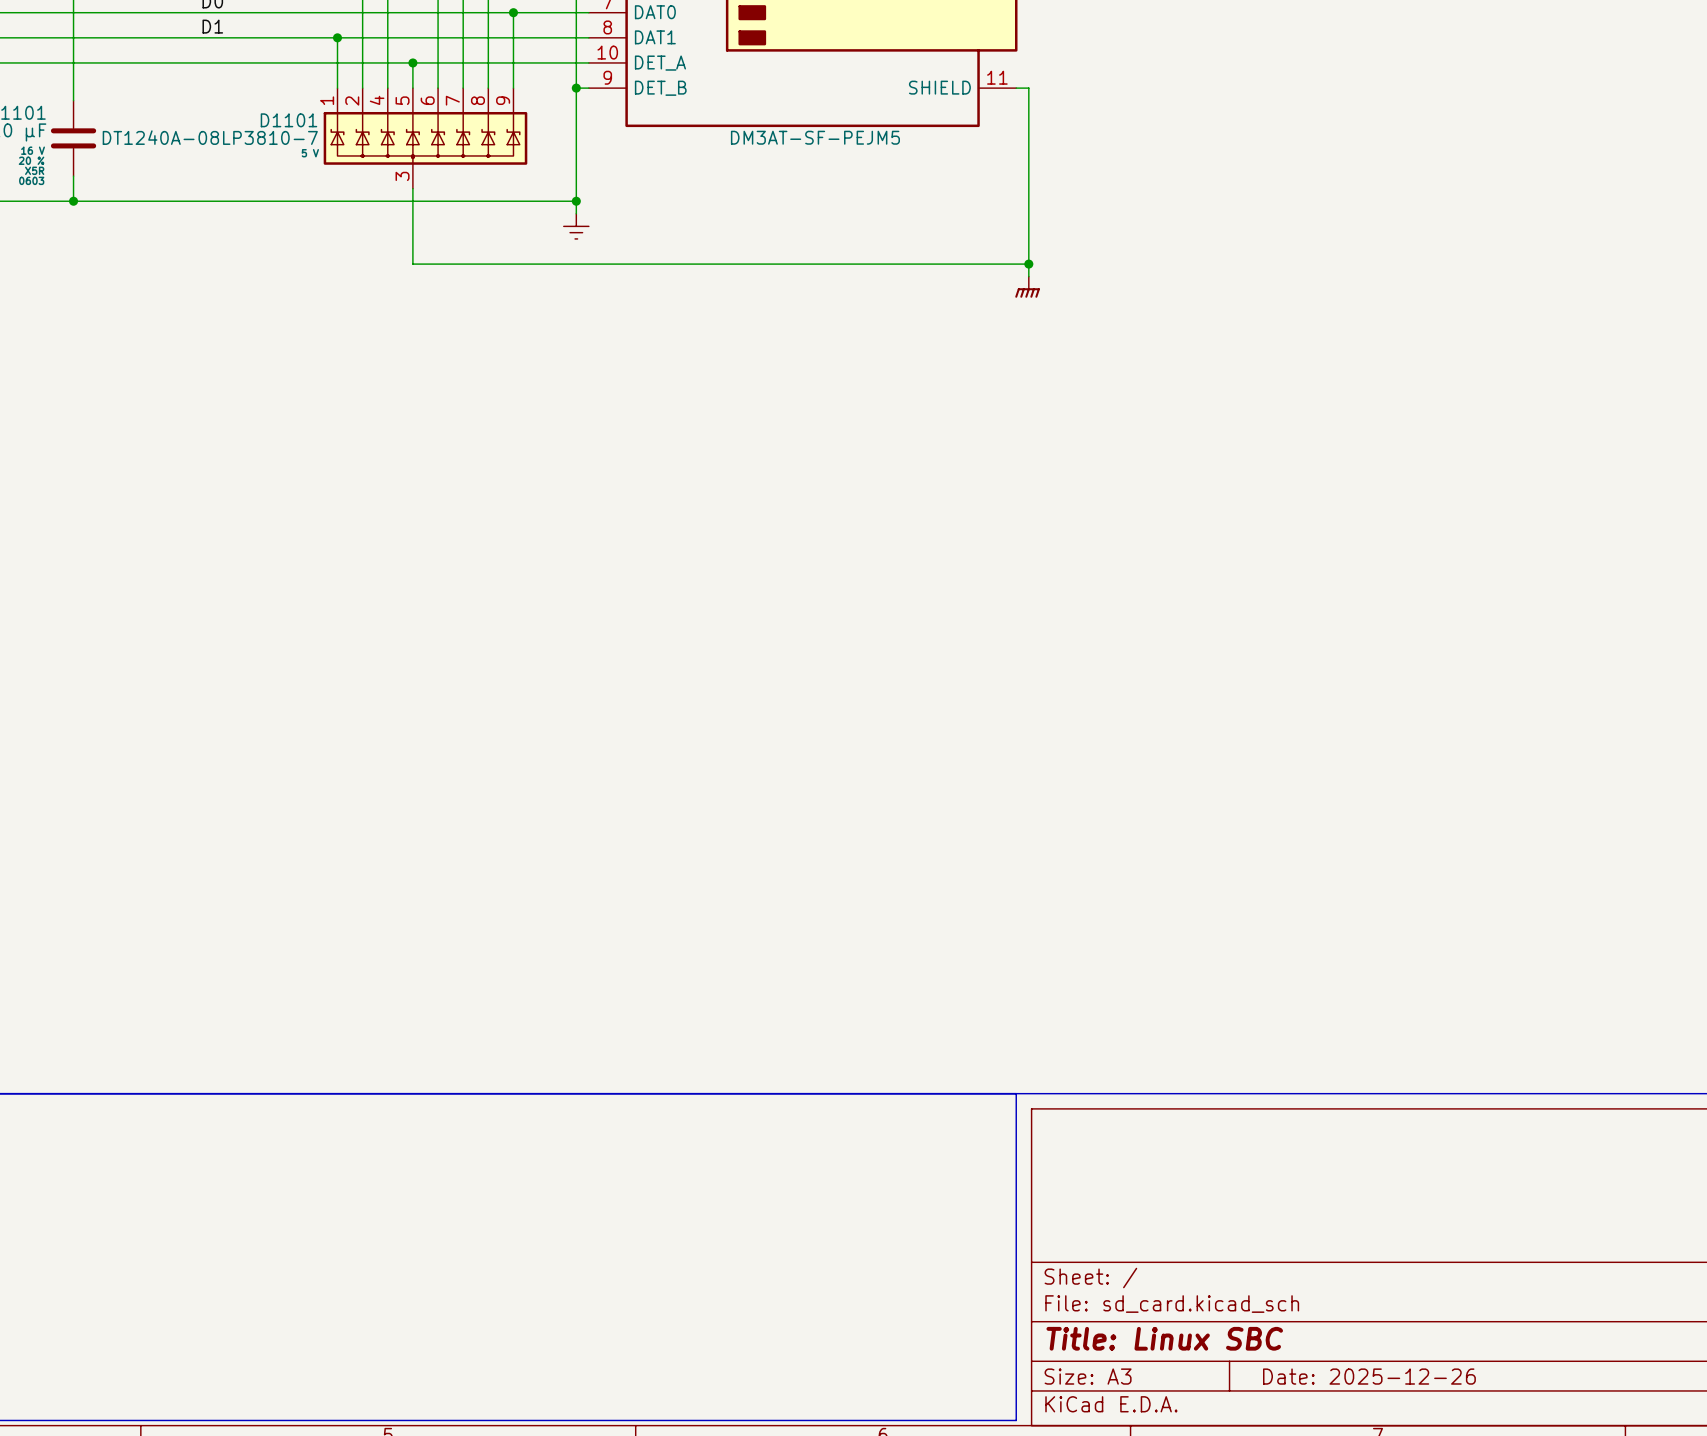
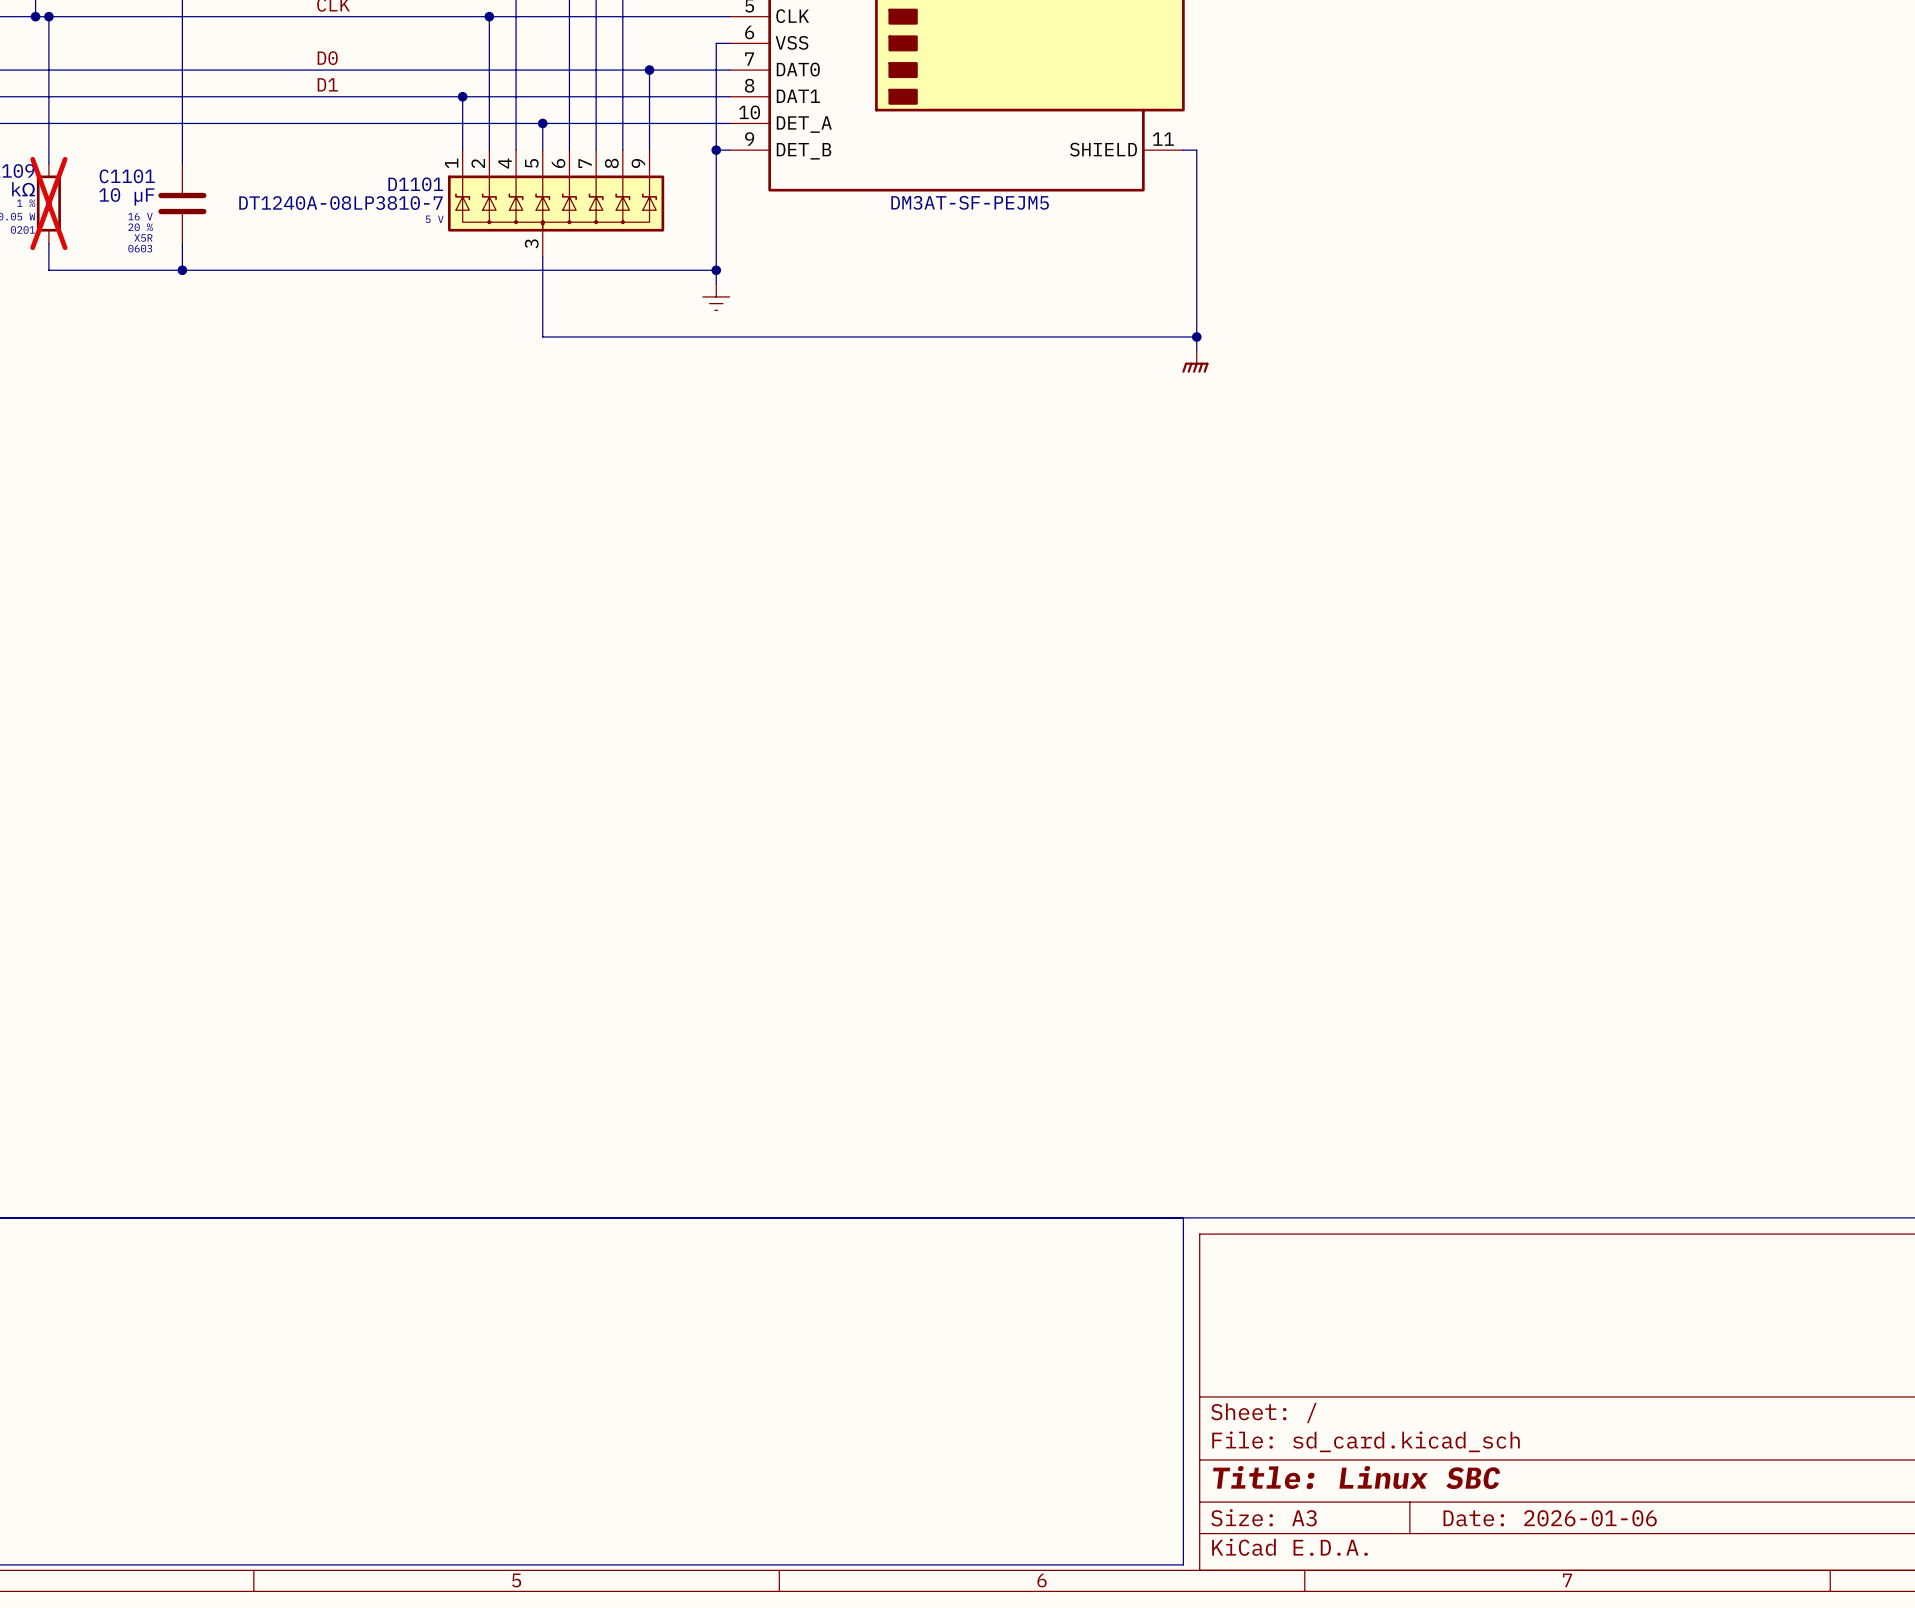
title block: Date: 2025-12-26 (1369, 1376) -> Date: 2026-01-06 (1550, 1518)

